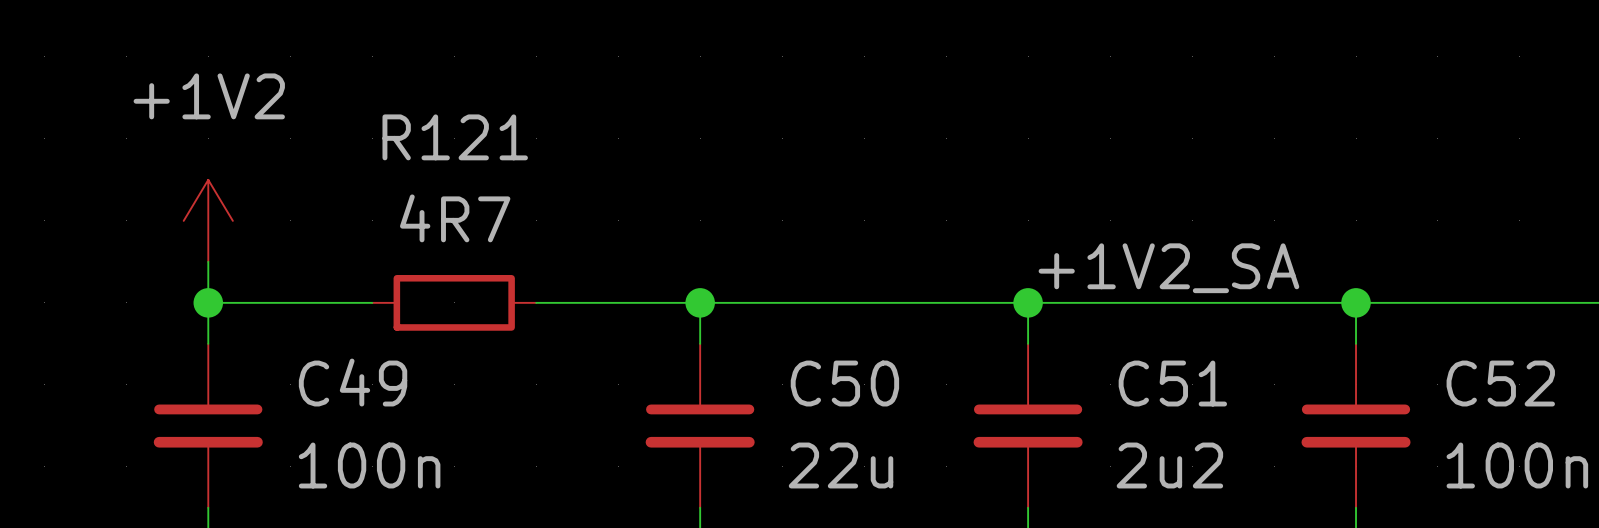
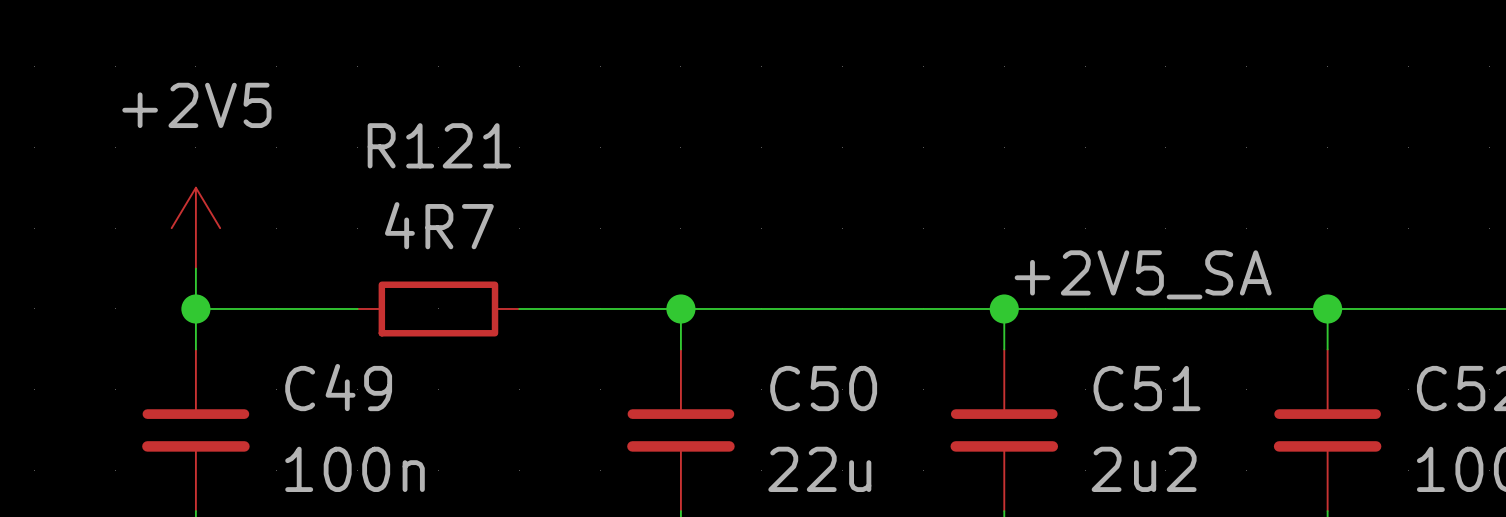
power symbol: +1V2 (208, 220) -> +2V5 (195, 228)
label: +1V2_SA (1168, 268) -> +2V5_SA (1143, 274)

